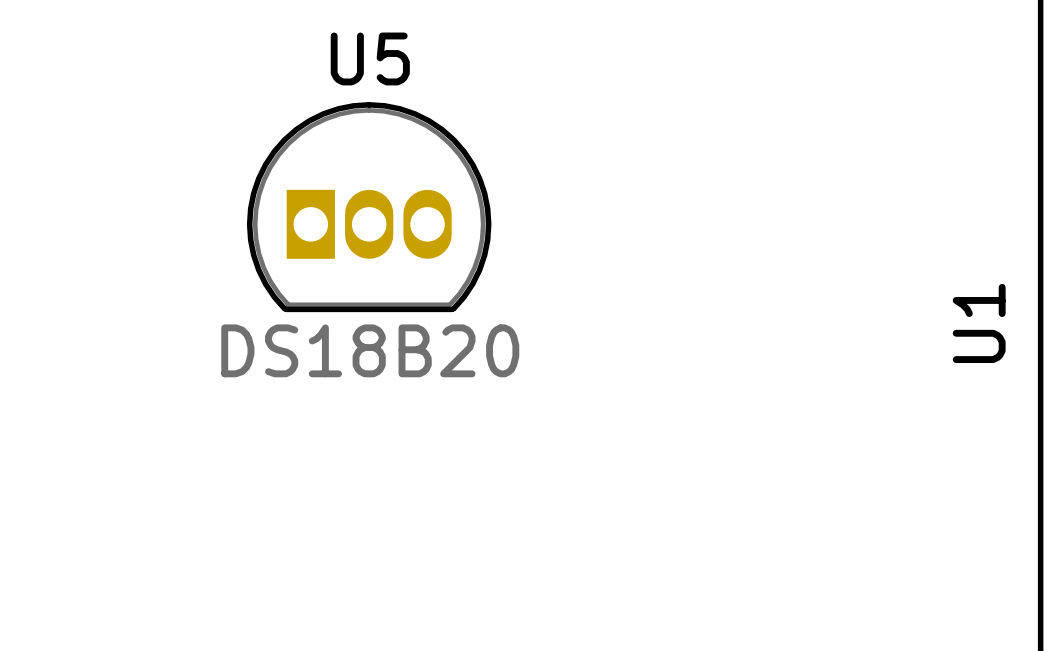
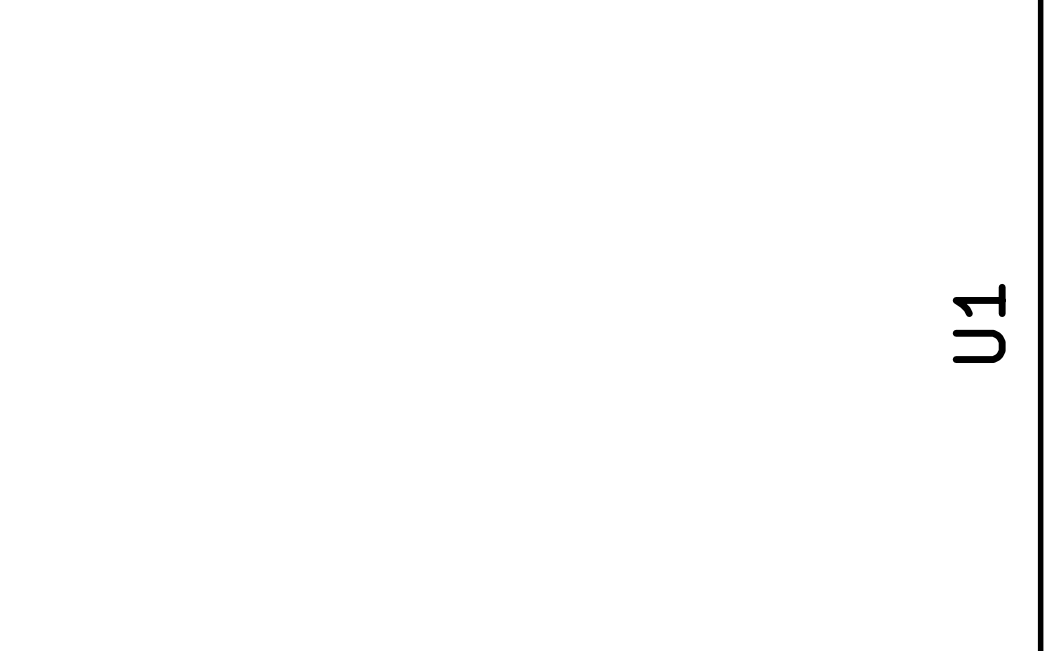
U5: DS18B20 (369, 207) -> none

